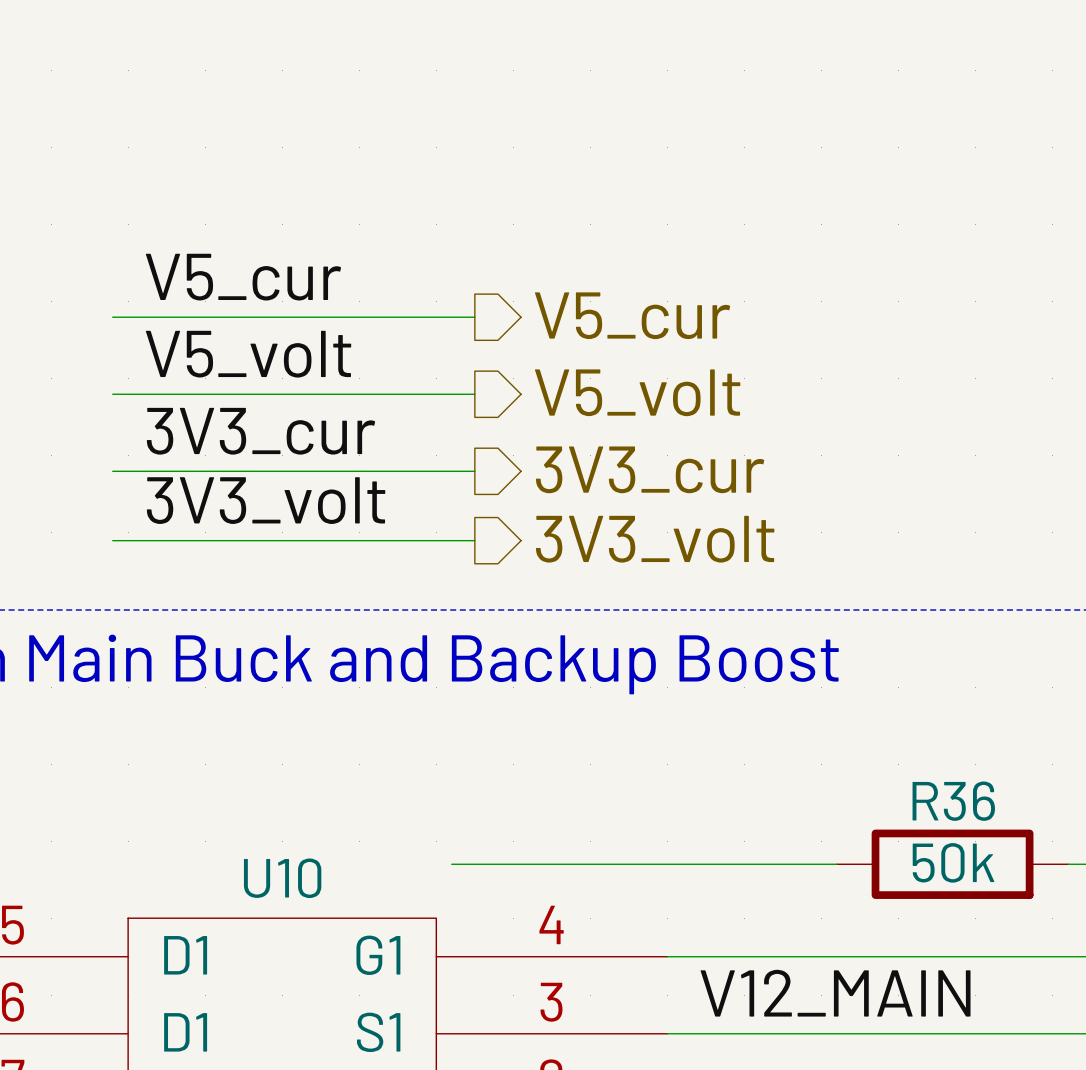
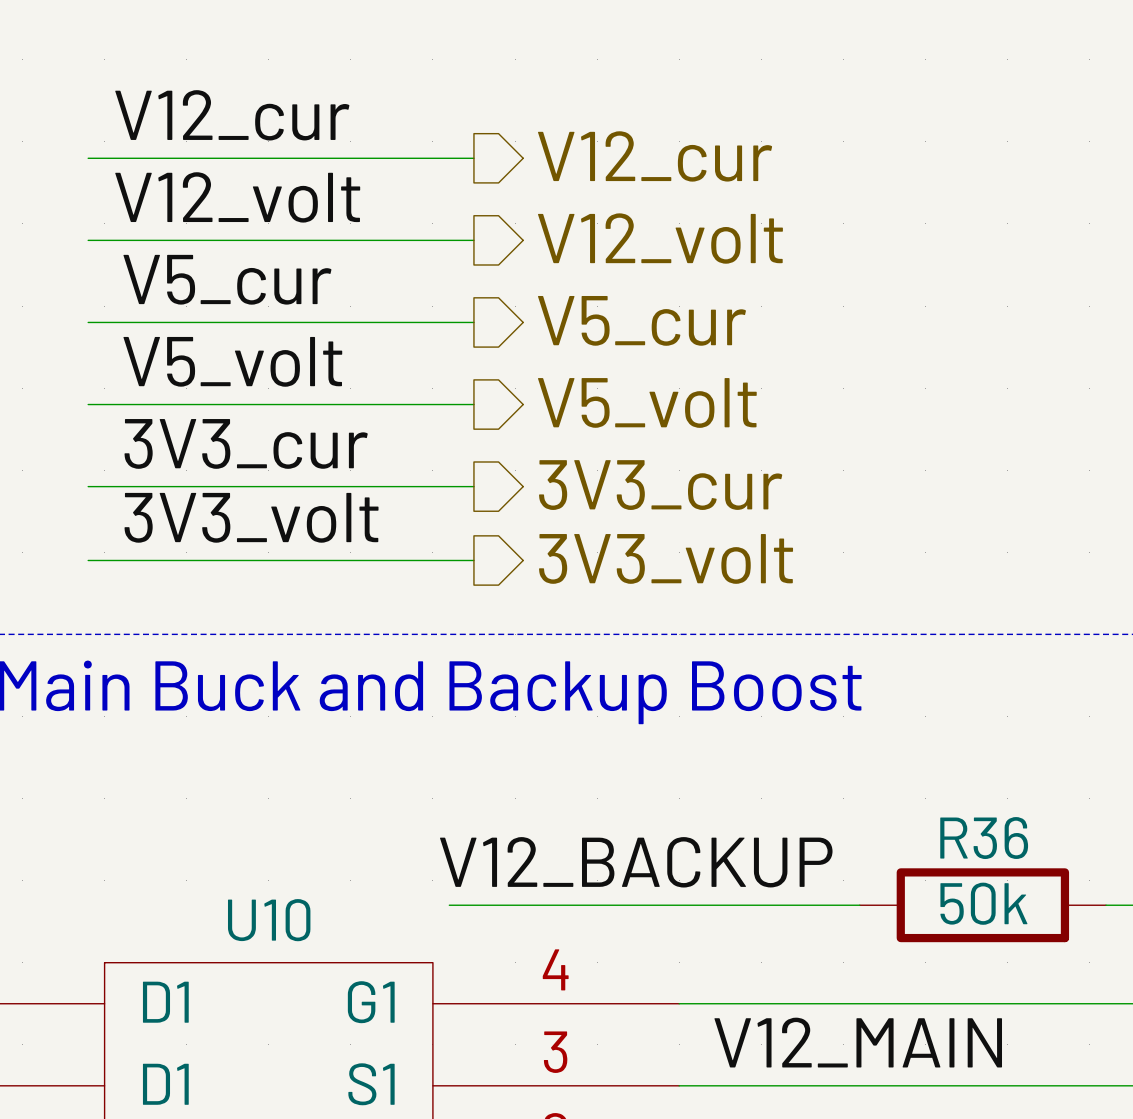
label: none -> V12_cur (232, 115)
hierarchical label: none -> V12_cur (655, 156)
wire: none -> (88, 158) (473, 158)
label: none -> V12_volt (237, 197)
hierarchical label: none -> V12_volt (660, 238)
wire: none -> (88, 240) (473, 240)
label: none -> V12_BACKUP (636, 862)

